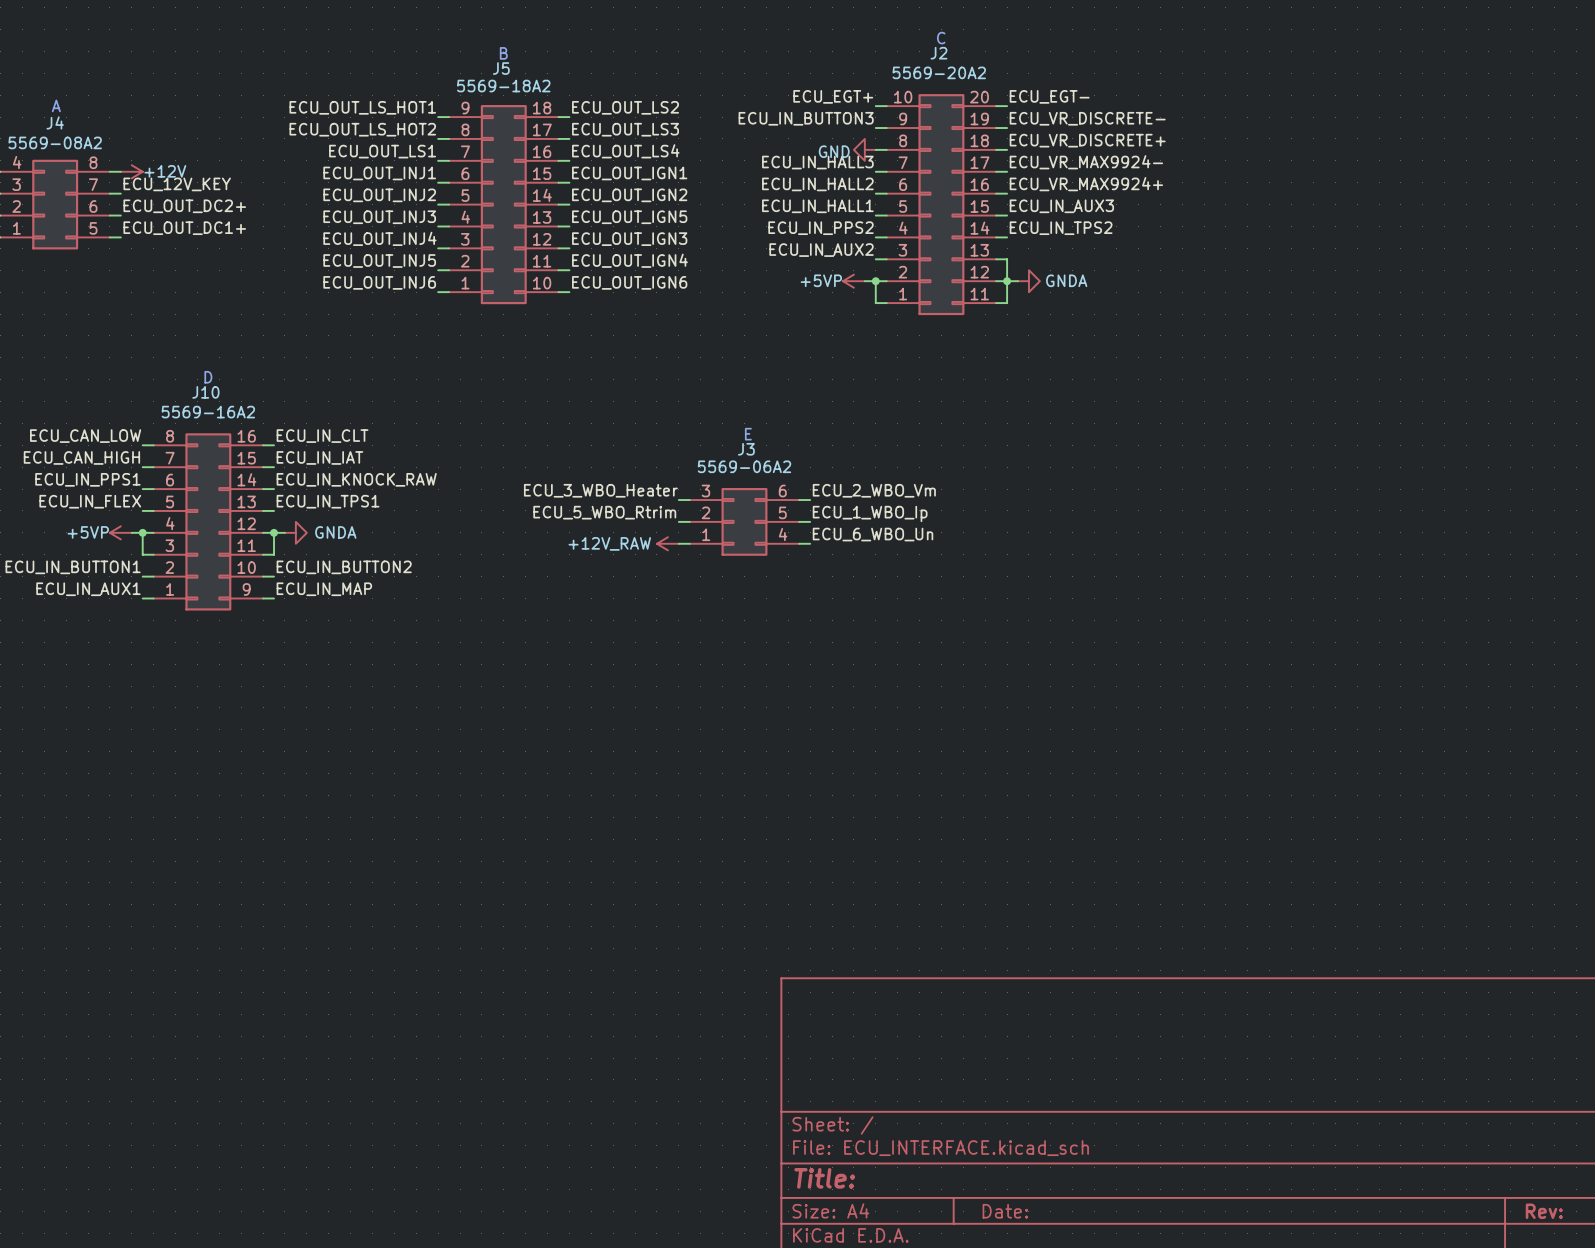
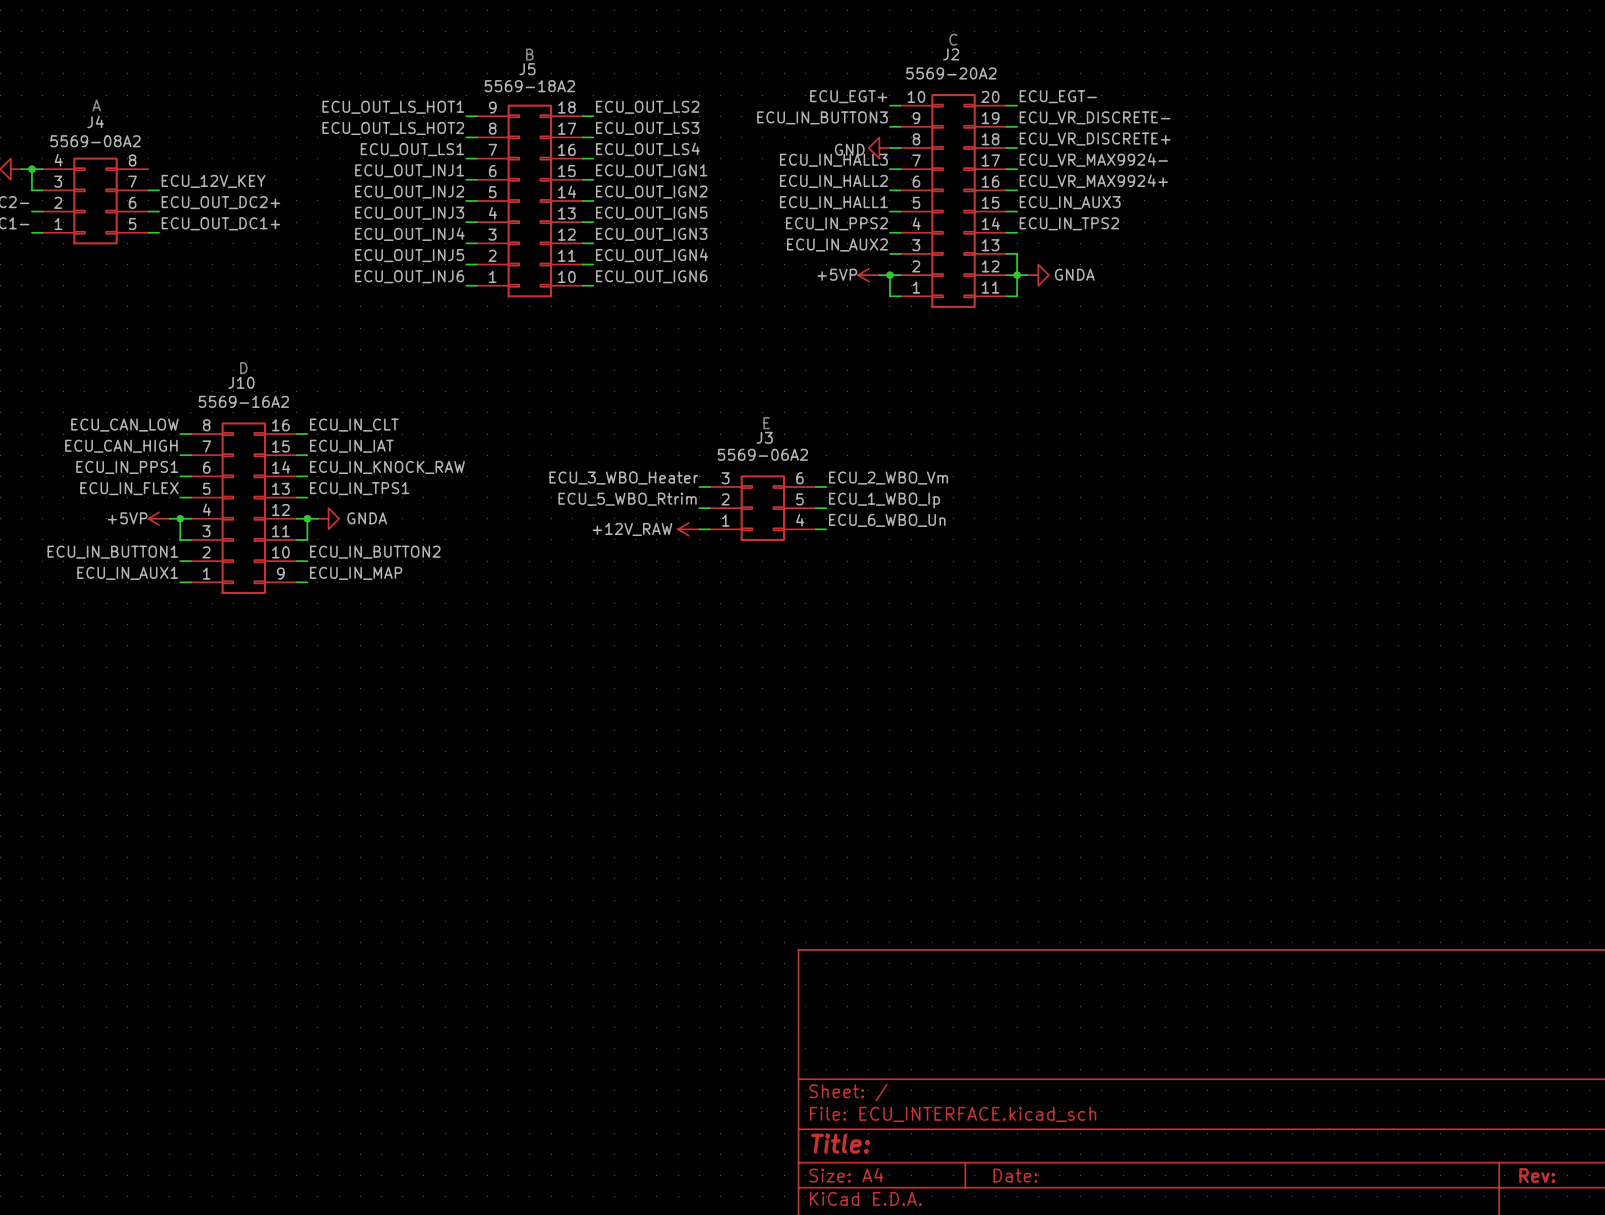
wire: (109, 171) (120, 171) -> none
power symbol: +12V (131, 171) -> none

